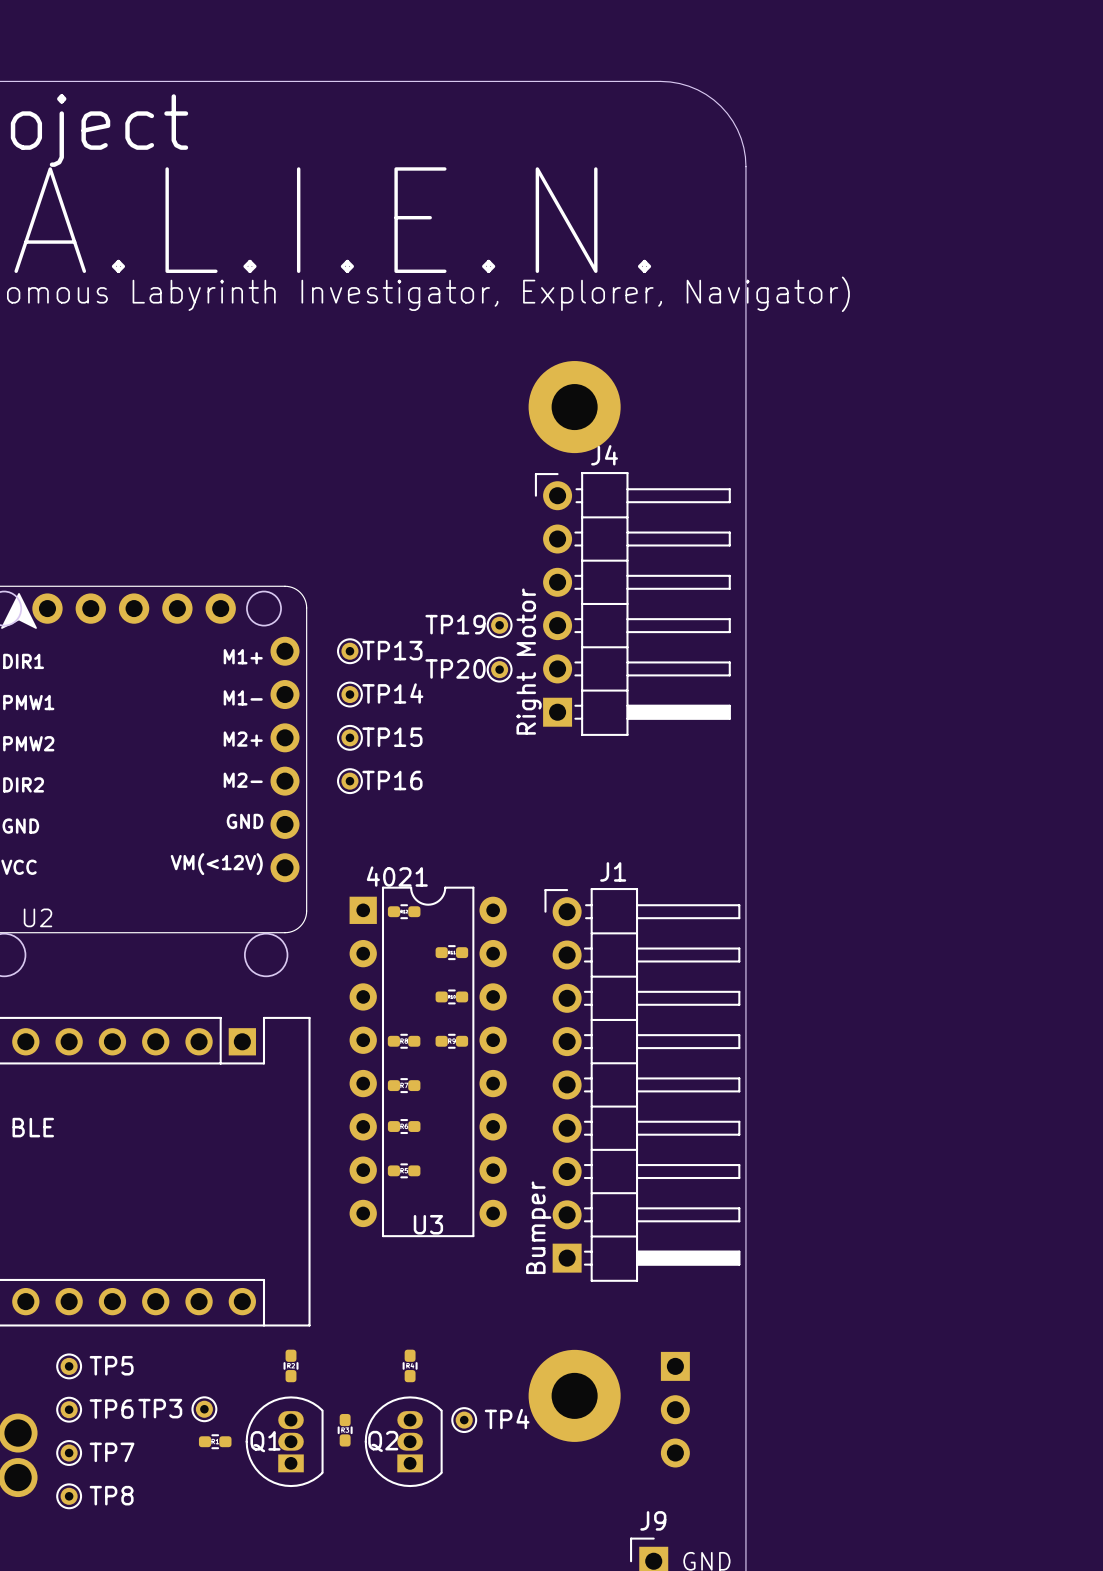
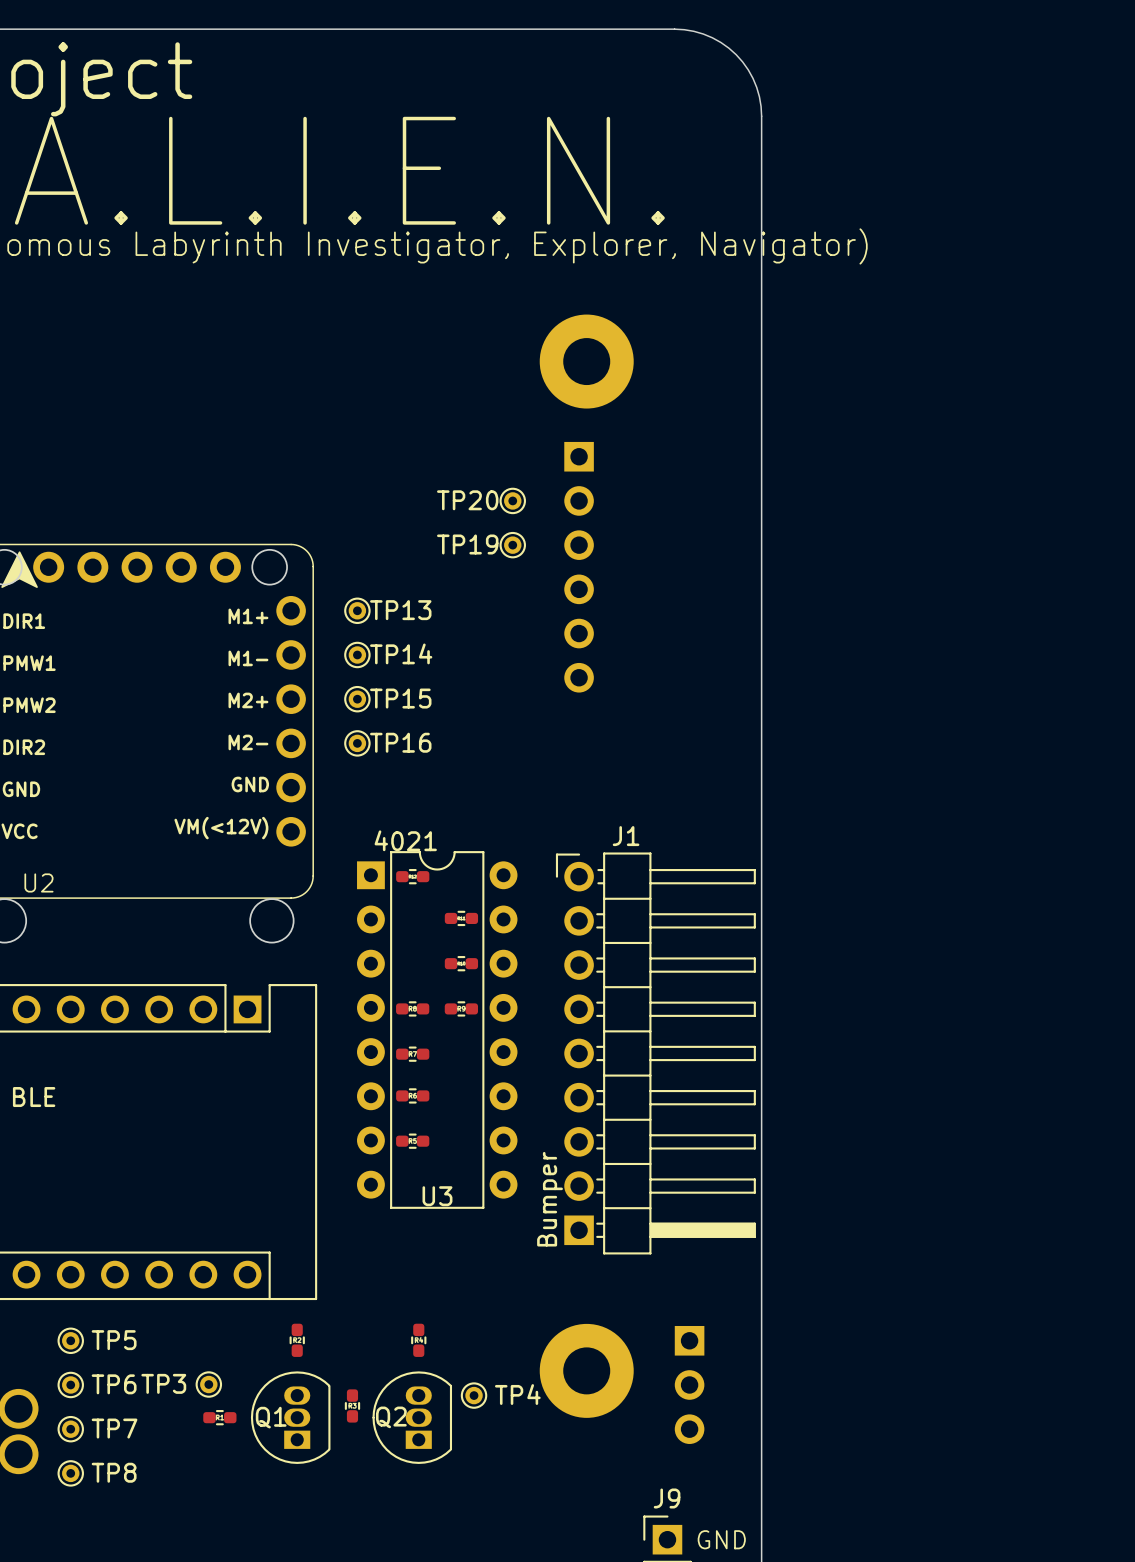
J4 side: top (632, 603) -> bottom (579, 567)
TP19 position: (499, 625) -> (512, 545)
TP20 position: (499, 669) -> (512, 500)

